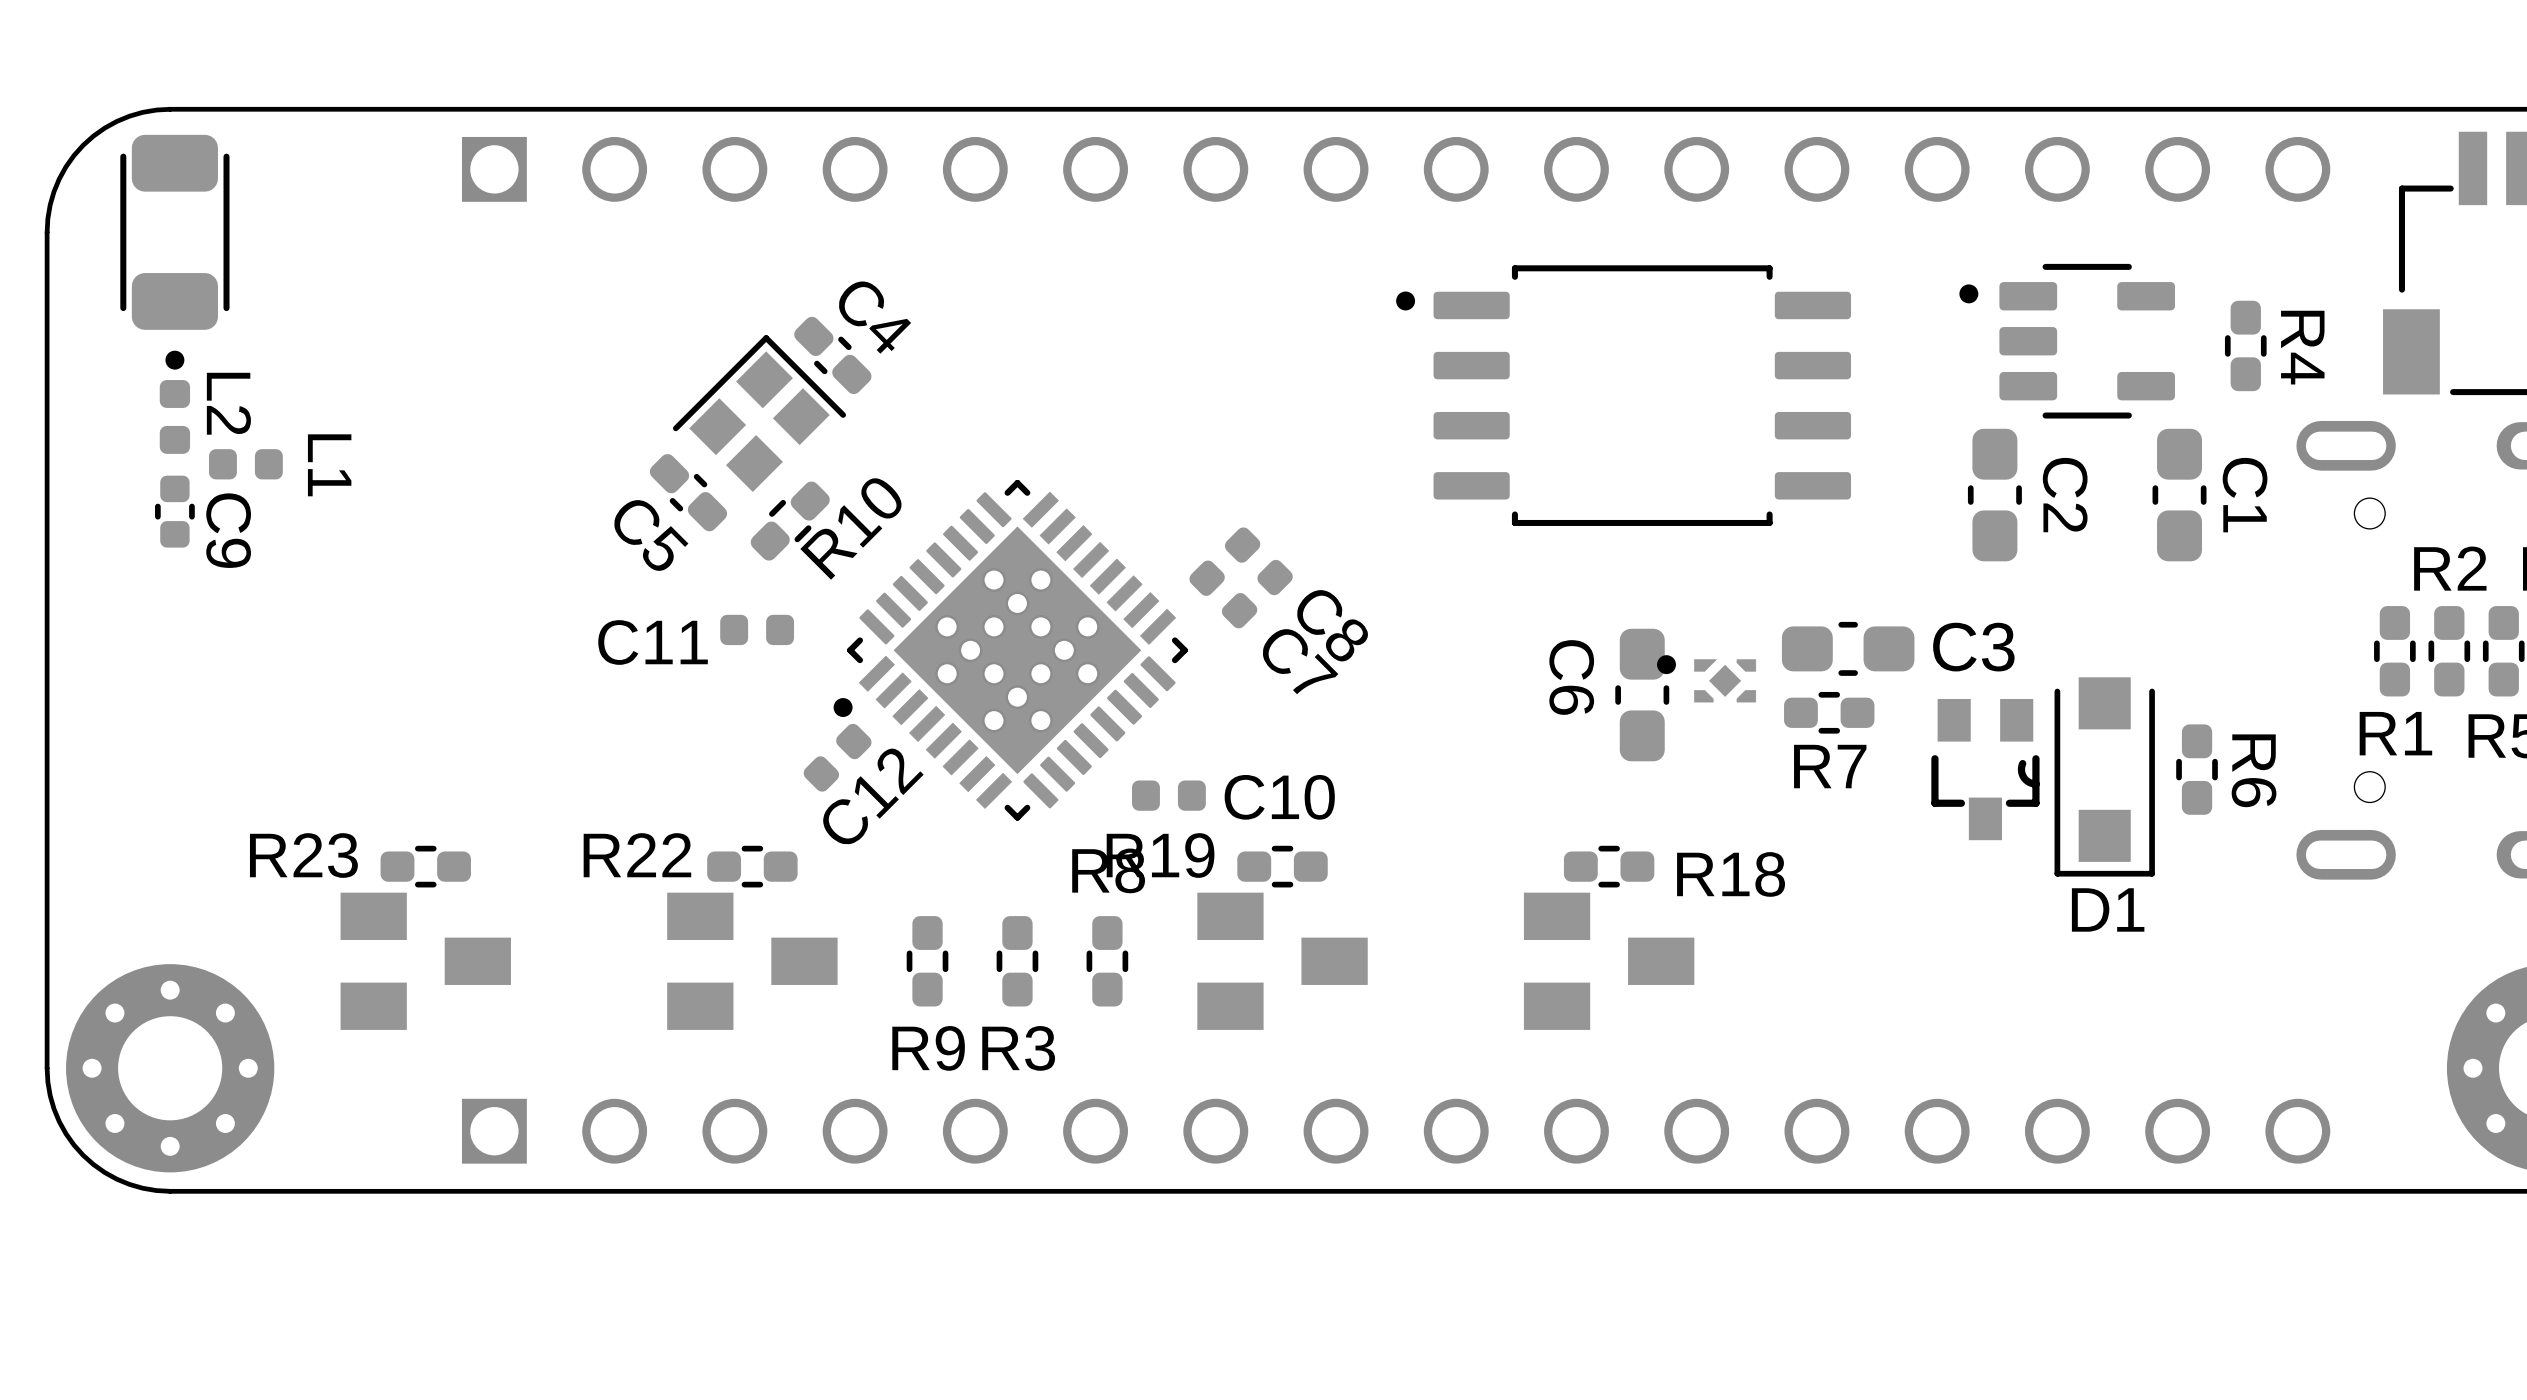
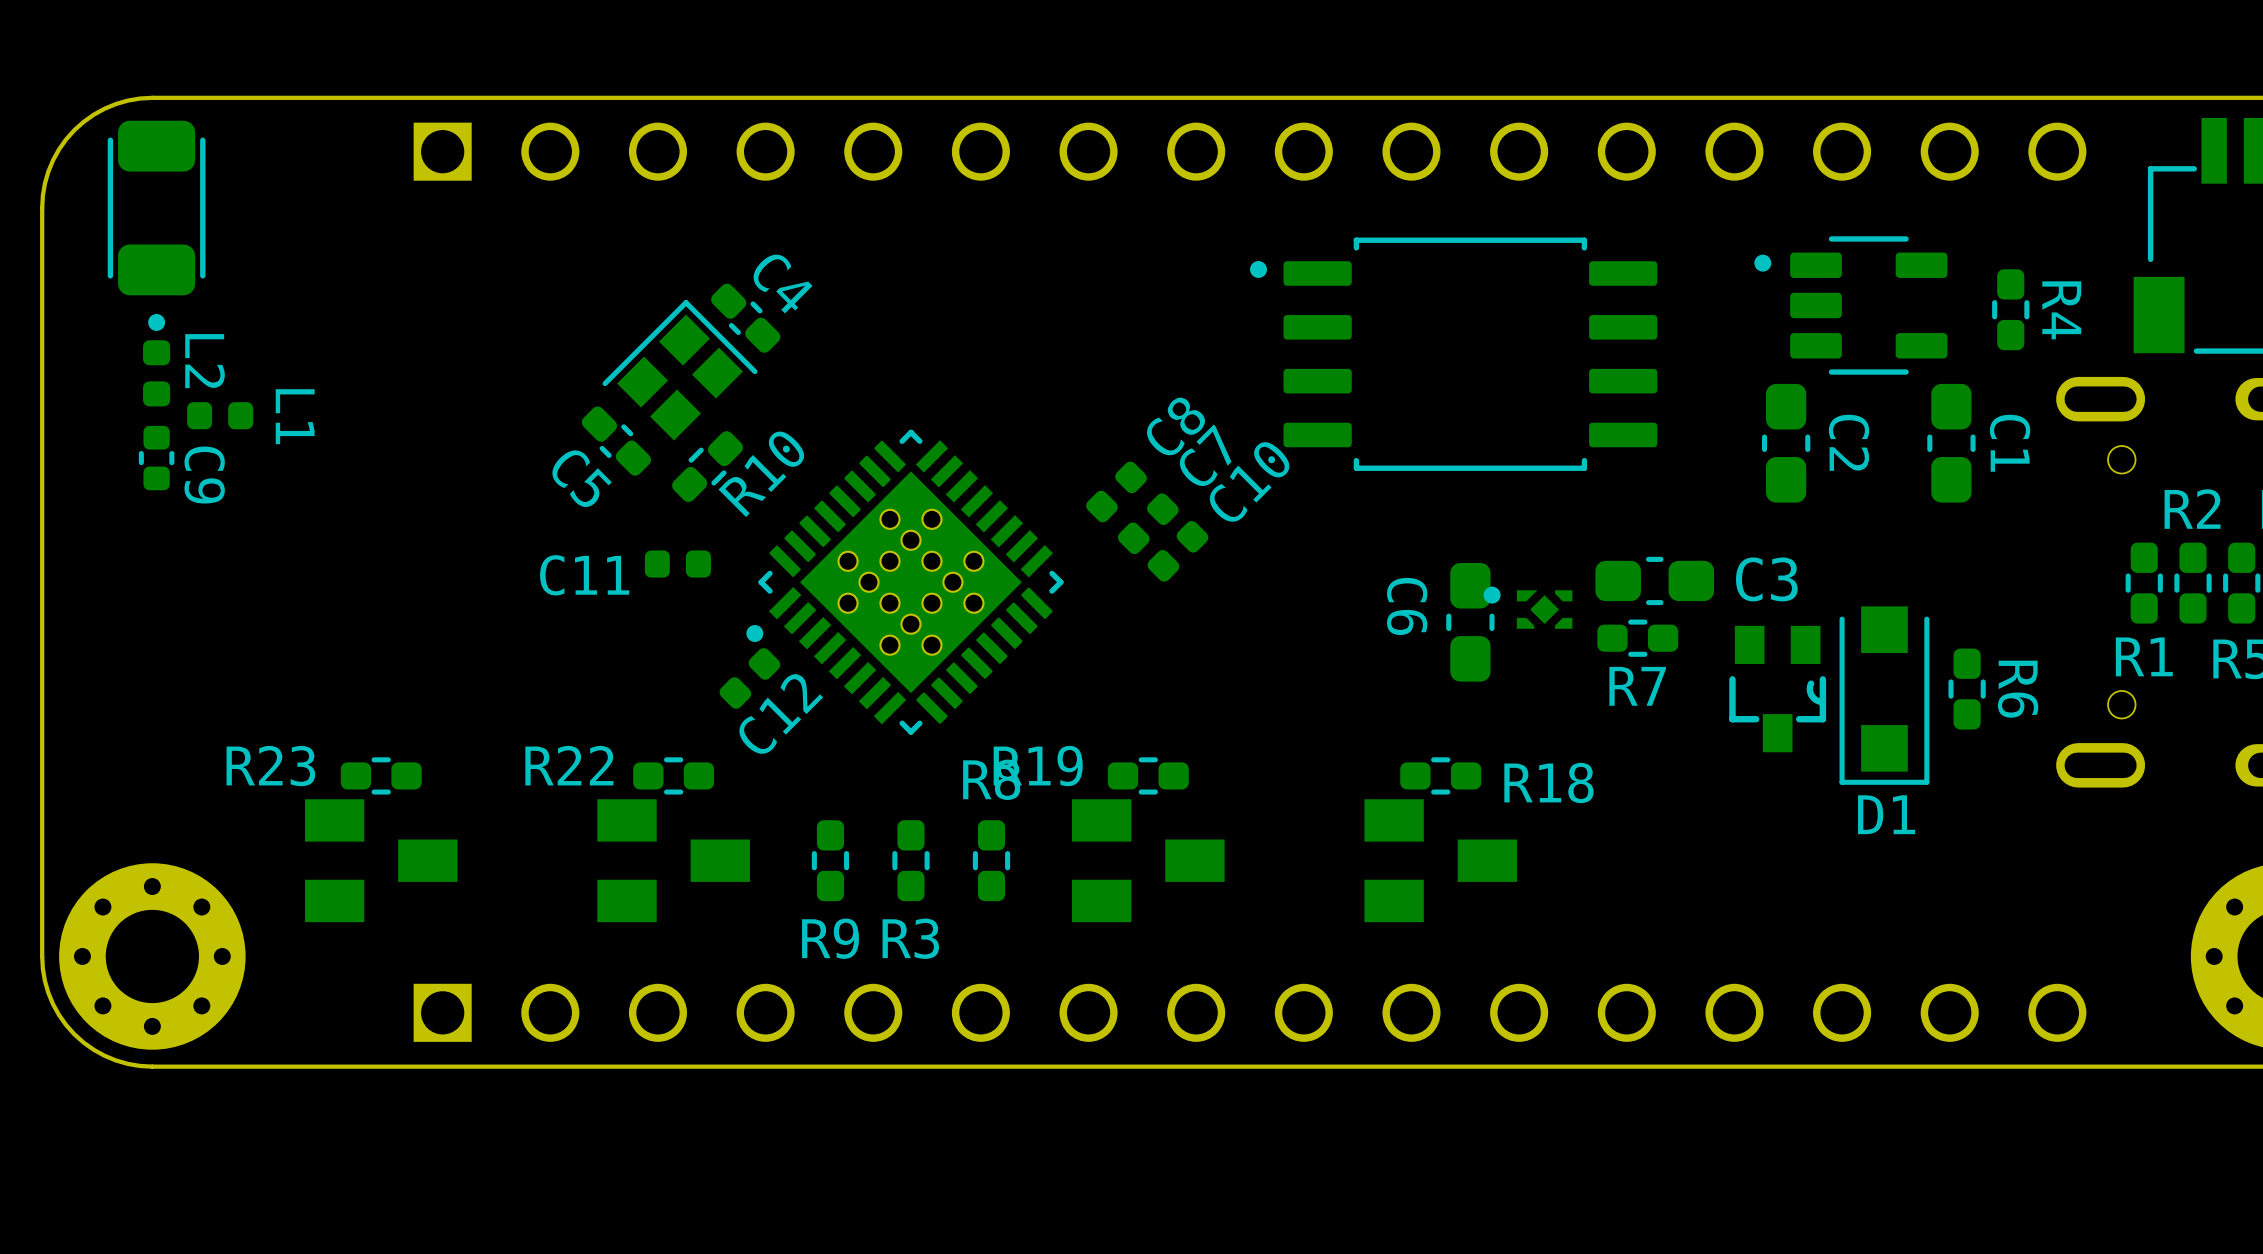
C7 rotation: 0° (1258, 561) -> 90° clockwise (1116, 491)
C8 rotation: 0° (1223, 594) -> 90° clockwise (1148, 523)
C8 position: (1223, 594) -> (1148, 523)
C8 name position: C8 (1332, 625) -> C8 (1175, 426)
C7 name position: C7 (1300, 661) -> C7 (1205, 455)
C10 rotation: 0° (1168, 795) -> 45° counterclockwise (1177, 551)
C10 position: (1168, 795) -> (1177, 551)

